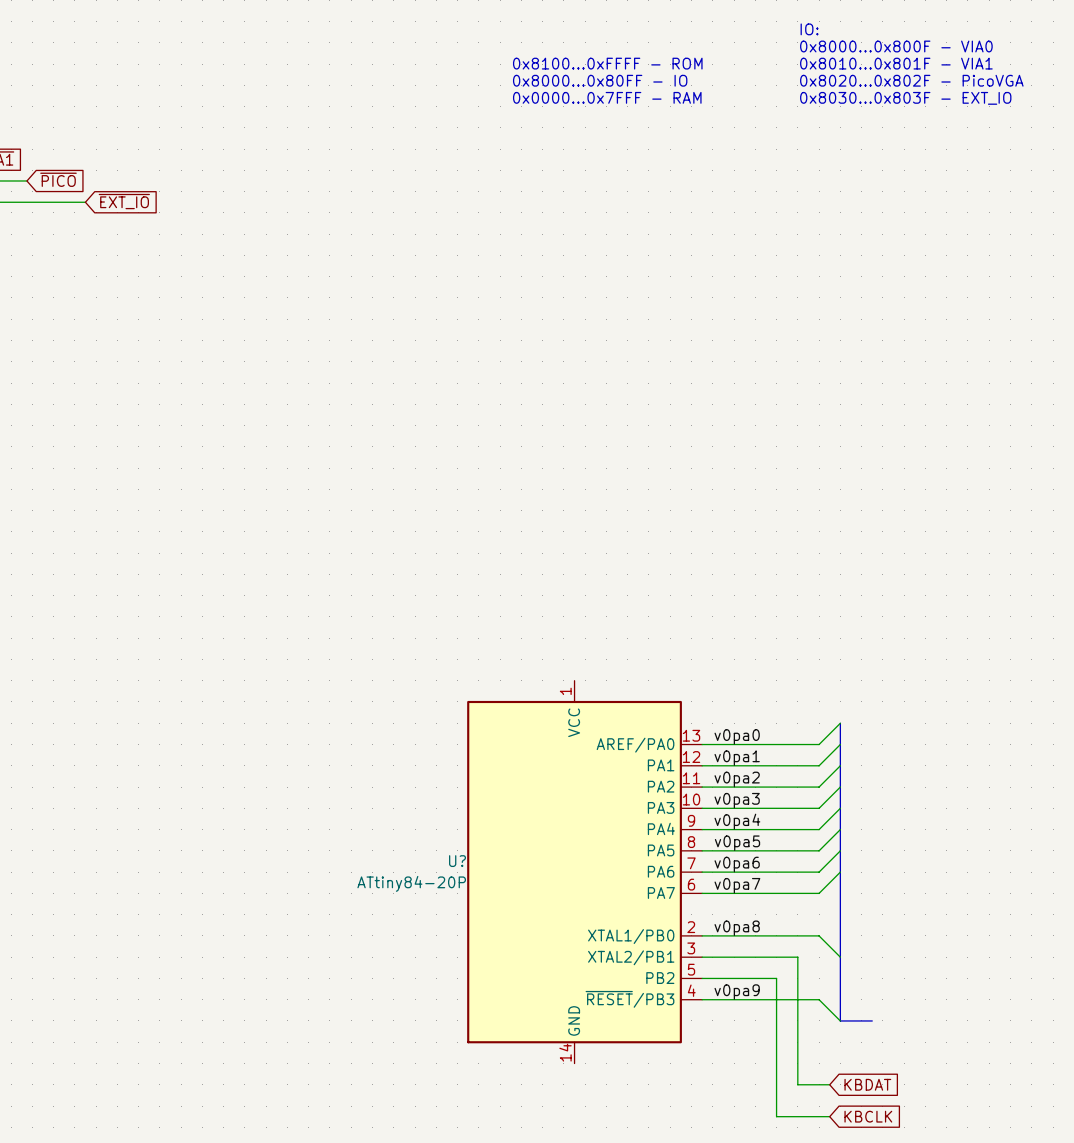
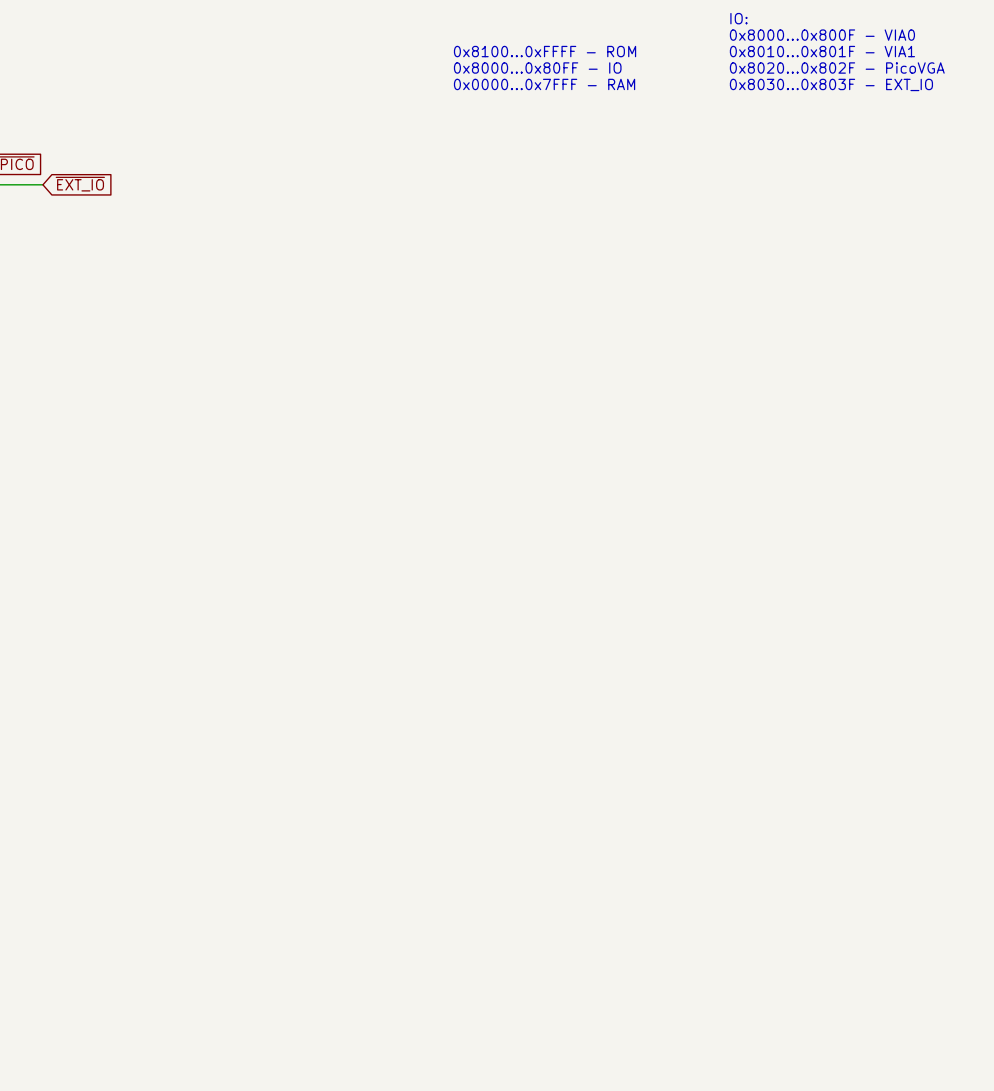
wire: (840, 723) (819, 744) (702, 744) -> none
bus: (840, 723) (840, 1020) (872, 1020) -> none
label: v0pa0 (737, 736) -> none
wire: (840, 744) (819, 765) (702, 765) -> none
label: v0pa1 (737, 758) -> none
wire: (840, 765) (819, 787) (702, 787) -> none
label: v0pa2 (737, 779) -> none
wire: (840, 787) (819, 808) (702, 808) -> none
label: v0pa3 (737, 800) -> none
wire: (840, 808) (819, 829) (702, 829) -> none
label: v0pa4 (737, 821) -> none
wire: (840, 829) (819, 850) (702, 850) -> none
label: v0pa5 (737, 843) -> none
wire: (840, 850) (819, 872) (702, 872) -> none
label: v0pa6 (737, 864) -> none
U?: ATtiny84-20P (584, 872) -> none
wire: (840, 872) (819, 893) (702, 893) -> none
label: v0pa7 (737, 885) -> none
label: v0pa8 (737, 928) -> none
wire: (702, 935) (819, 935) (840, 957) -> none
wire: (702, 957) (797, 957) (797, 1084) (829, 1084) -> none
wire: (702, 978) (776, 978) (776, 1116) (829, 1116) -> none
label: v0pa9 (737, 991) -> none
wire: (702, 999) (819, 999) (840, 1020) -> none
global label: KBDAT (867, 1084) -> none
global label: KBCLK (868, 1116) -> none

